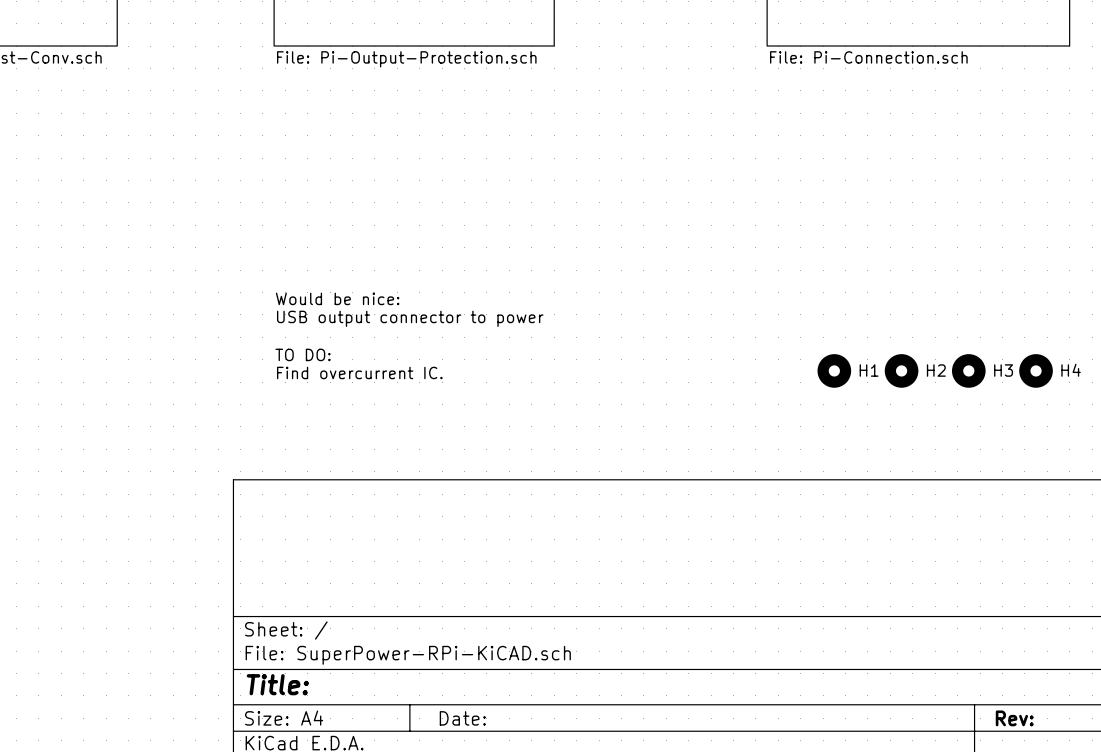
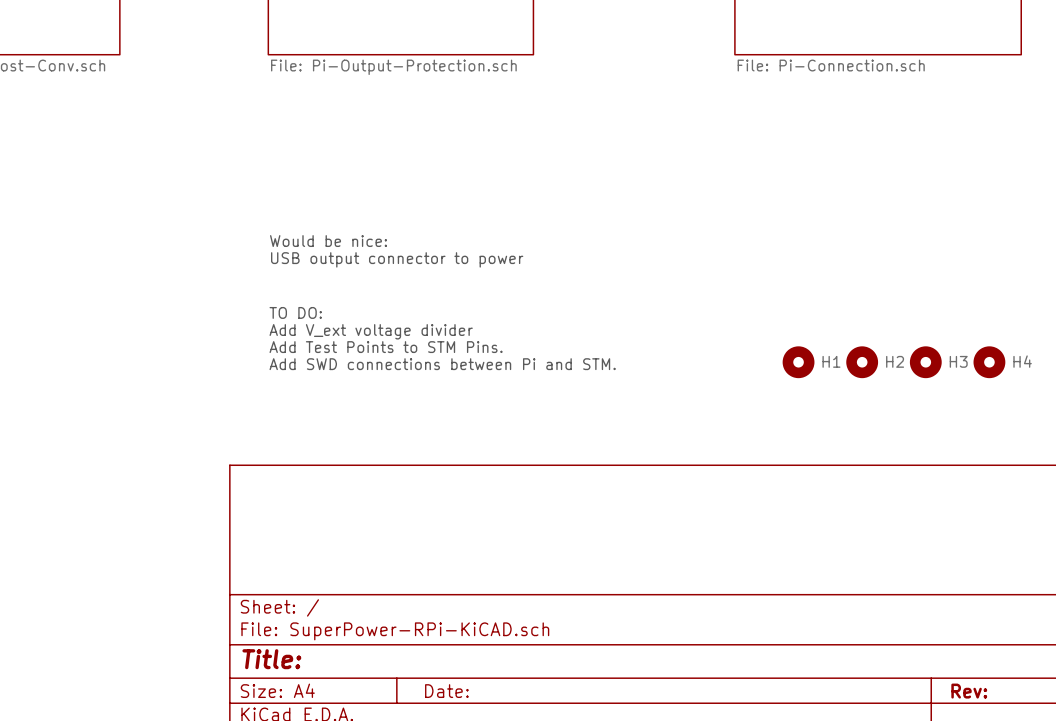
text position: Would be nice: (337, 298) -> Would be nice: (328, 241)
text: none -> TO DO: (295, 312)
text position: USB output connector to power (410, 318) -> USB output connector to power (397, 259)
text: none -> Add V_ext voltage divider (371, 331)
text: TO DO: (303, 354) -> Add Test Points to STM Pins. (386, 347)
text: Find overcurrent IC. (359, 372) -> Add SWD connections between Pi and STM. (442, 364)

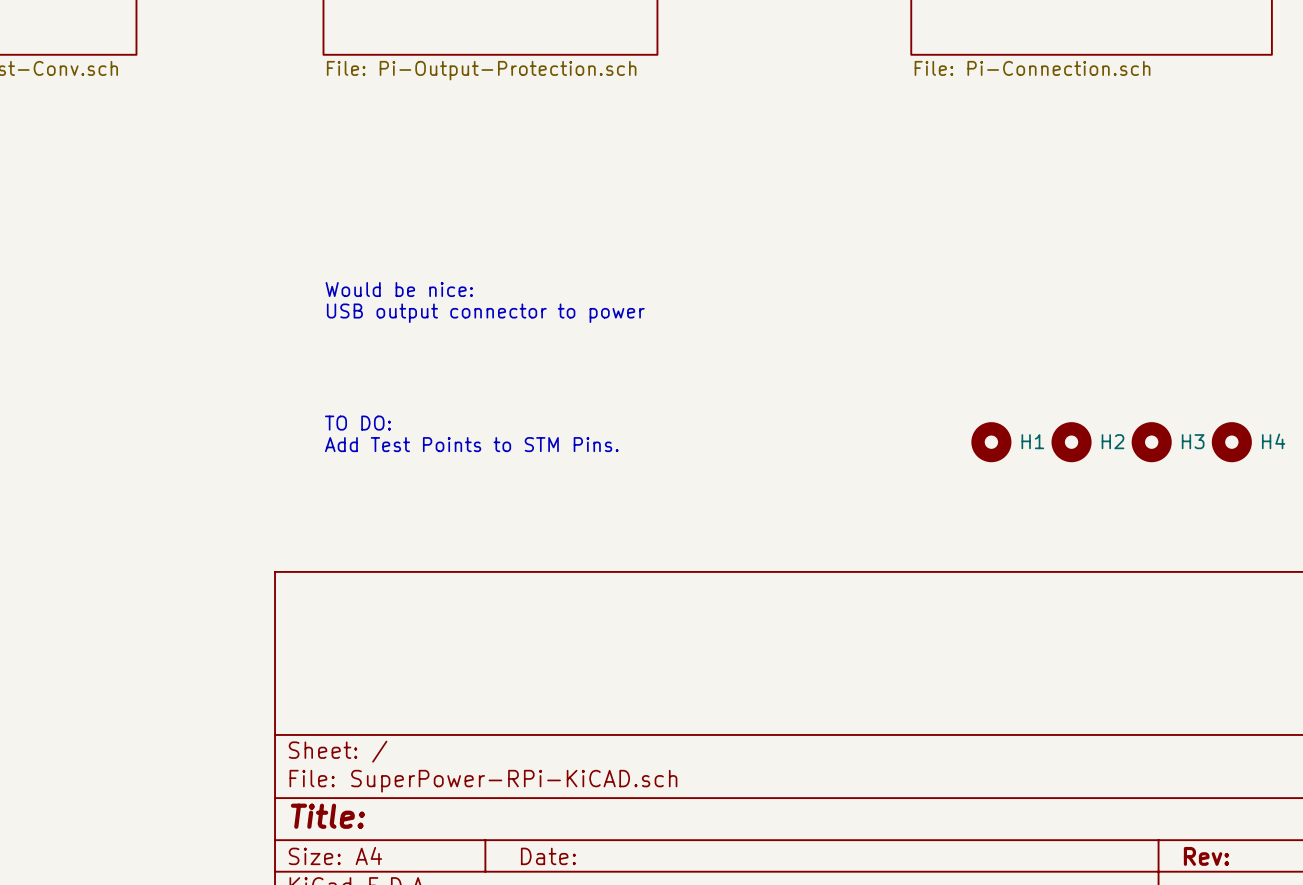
text: TO DO: (295, 312) -> none
text: Add V_ext voltage divider (371, 331) -> none
text: Add Test Points to STM Pins. (386, 347) -> TO DO: (357, 423)
text: Add SWD connections between Pi and STM. (442, 364) -> Add Test Points to STM Pins. (471, 444)

